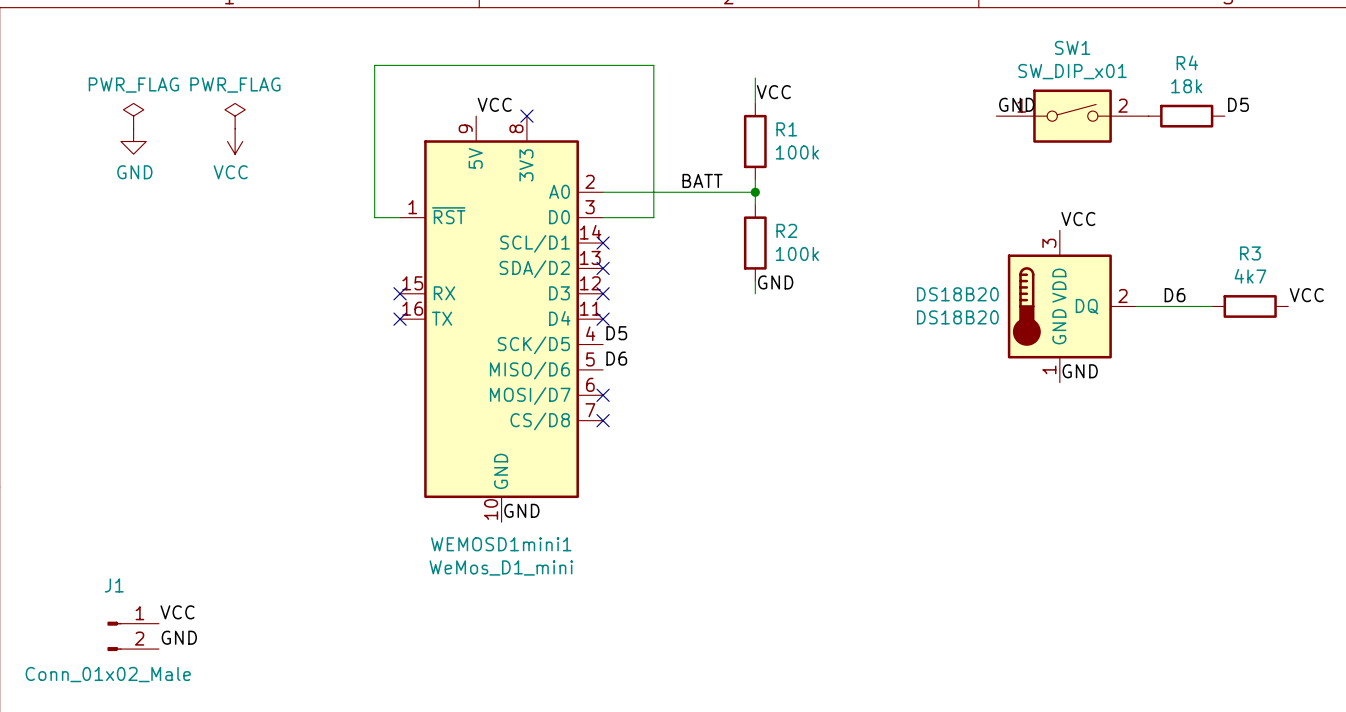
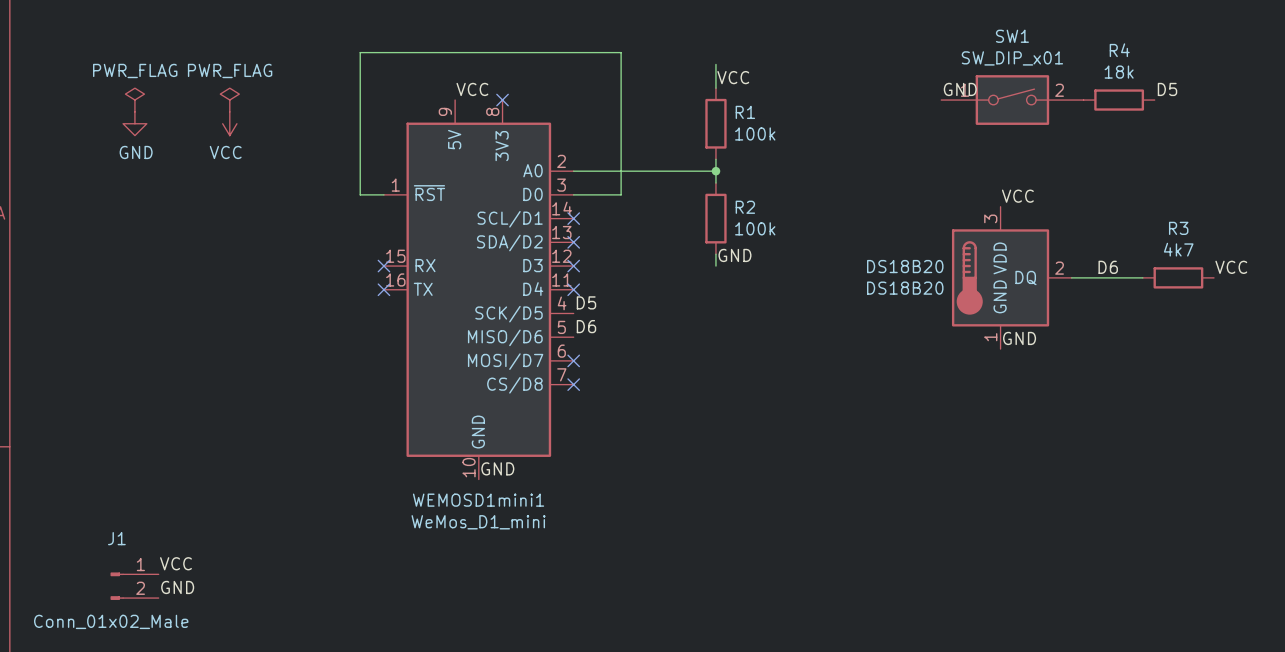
label: BATT (702, 180) -> none

